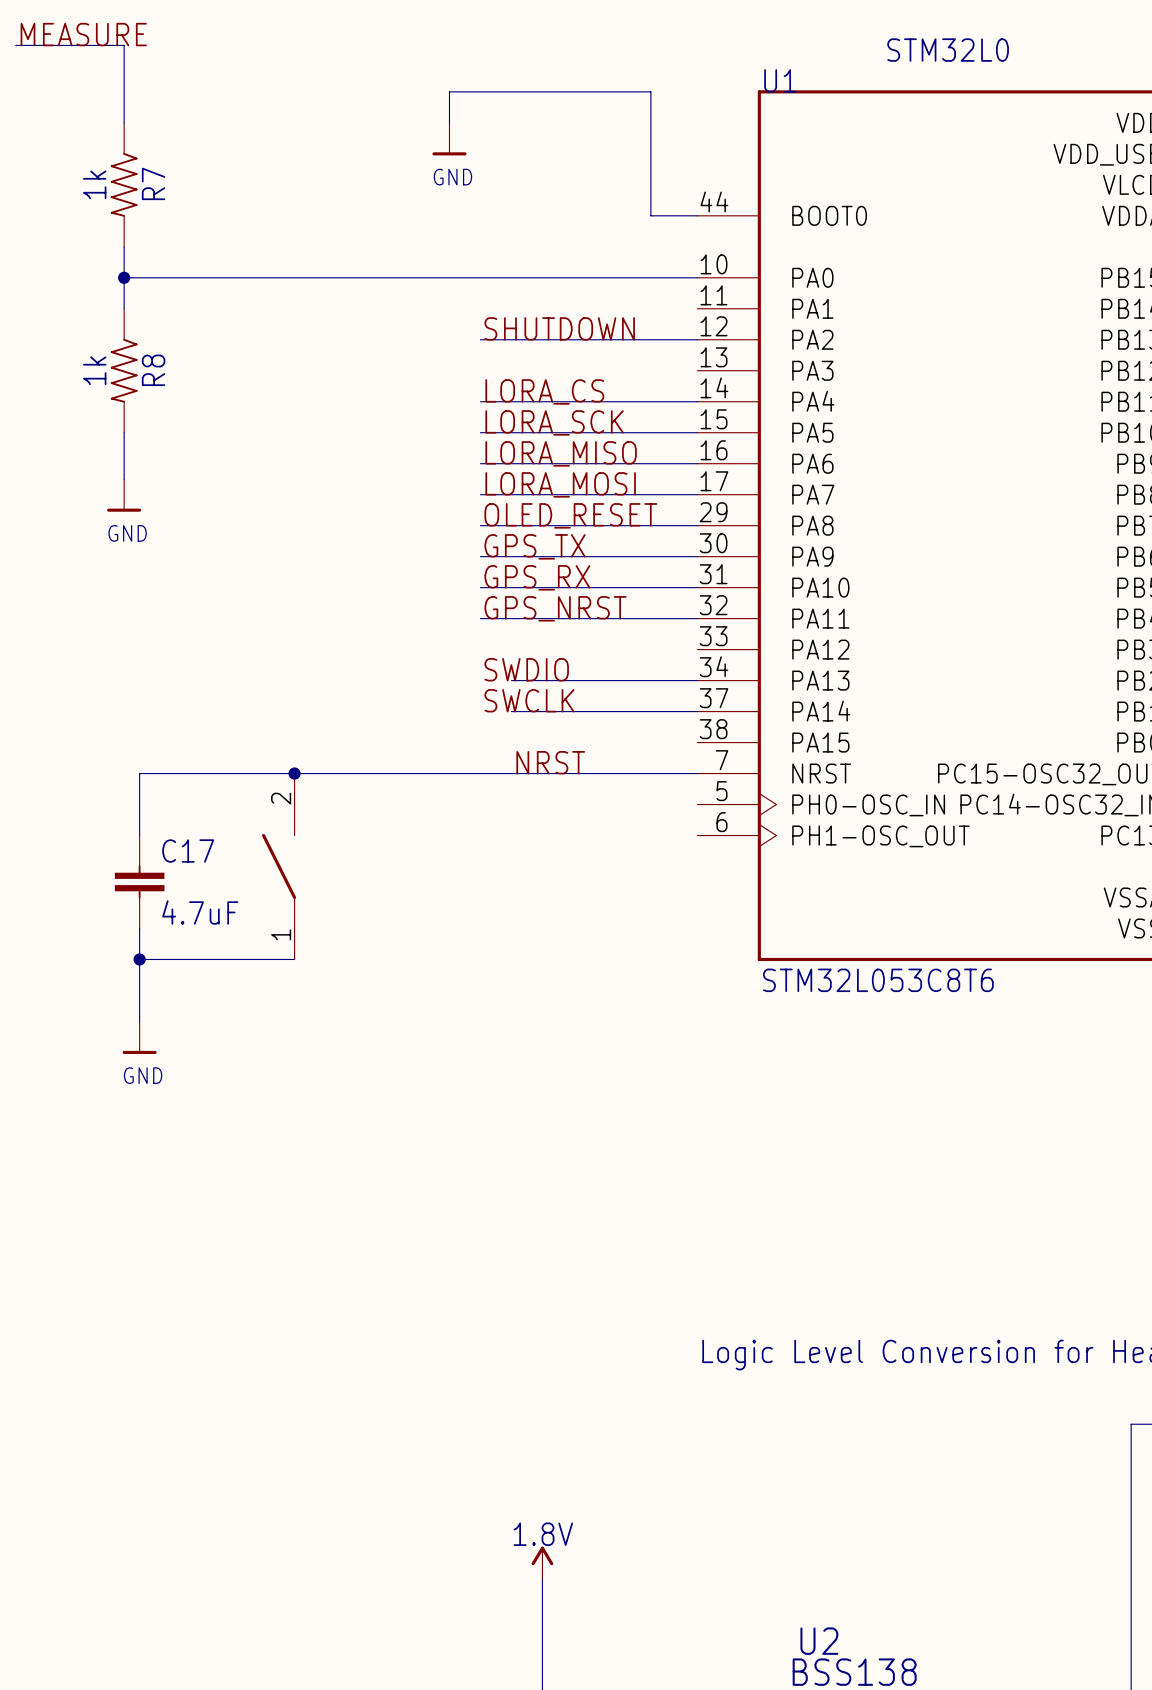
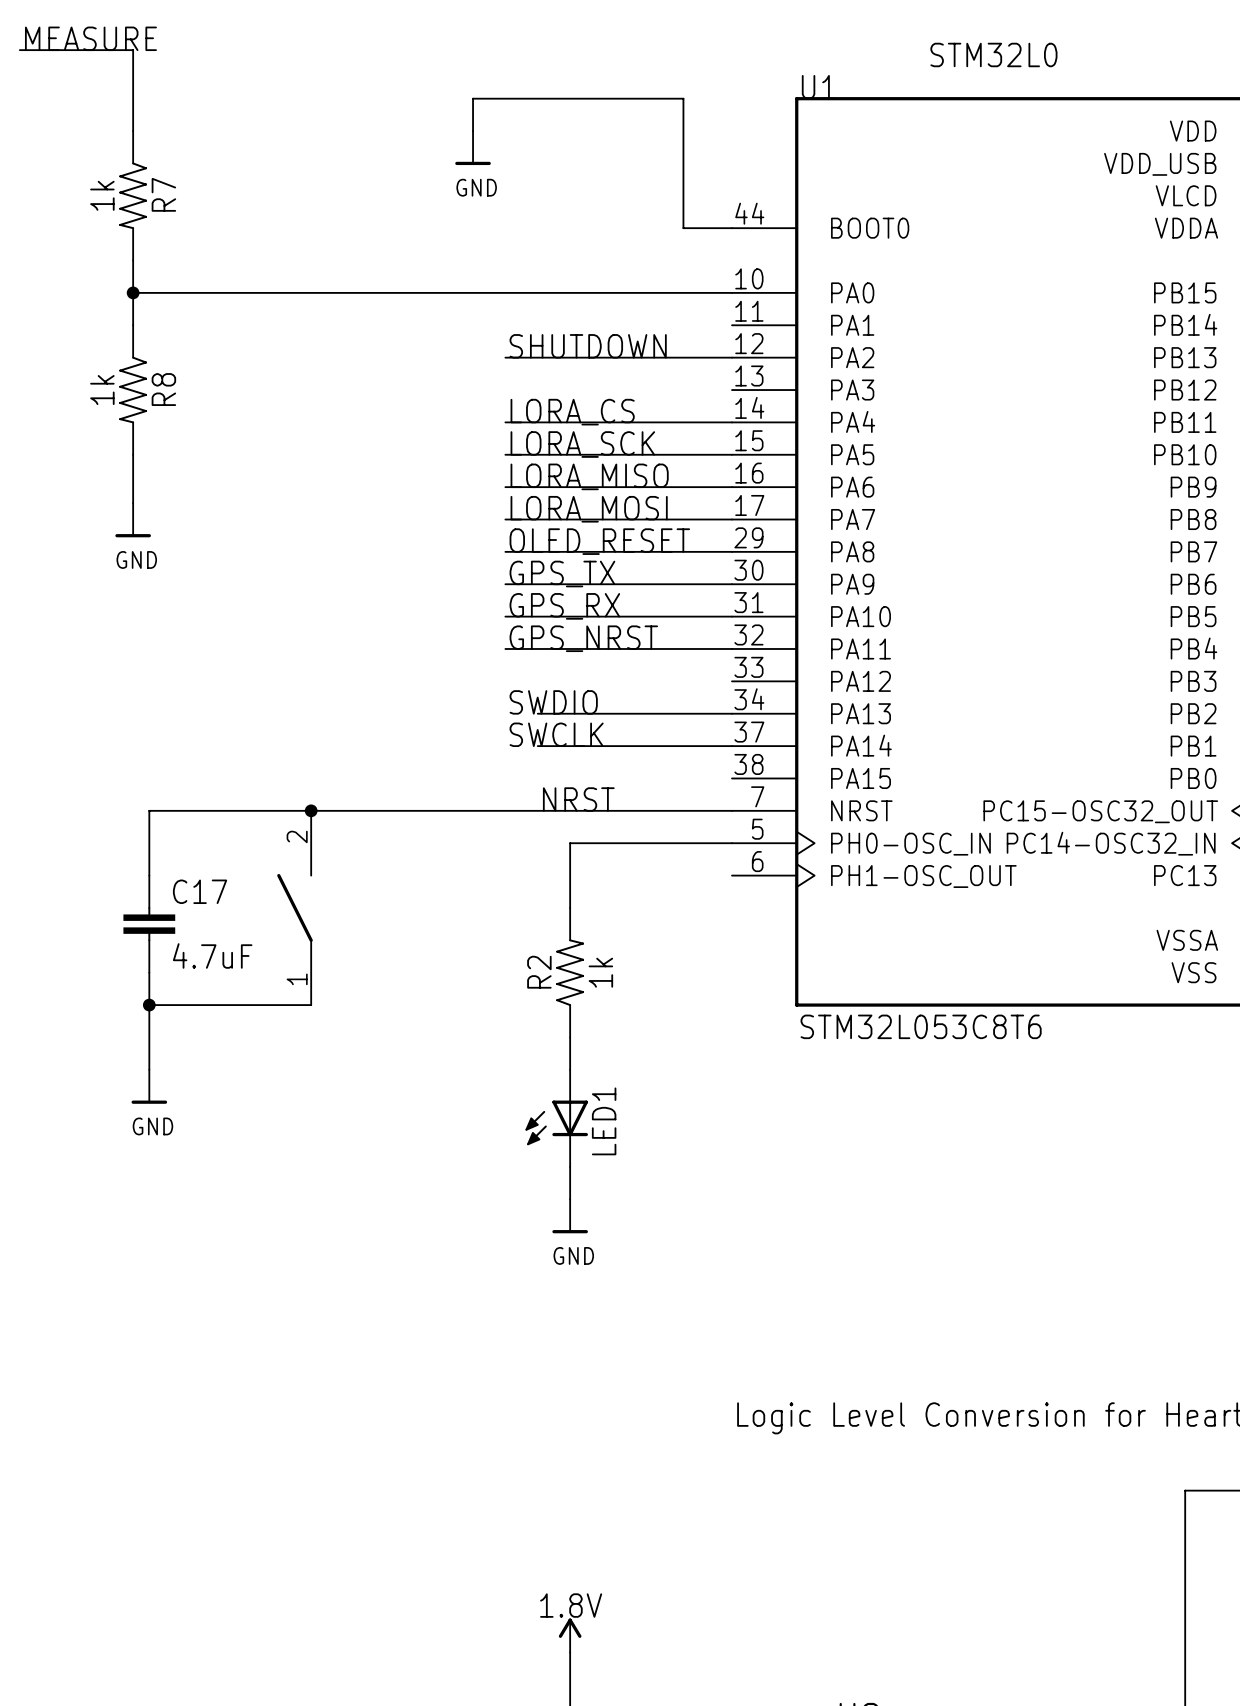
wire: none -> (731, 843) (570, 843) (570, 907)
R2: none -> 1k (570, 972)
wire: none -> (570, 1037) (570, 1069)
LED1: none -> (556, 1118)
wire: none -> (570, 1166) (570, 1199)
power symbol: none -> GND (570, 1216)

